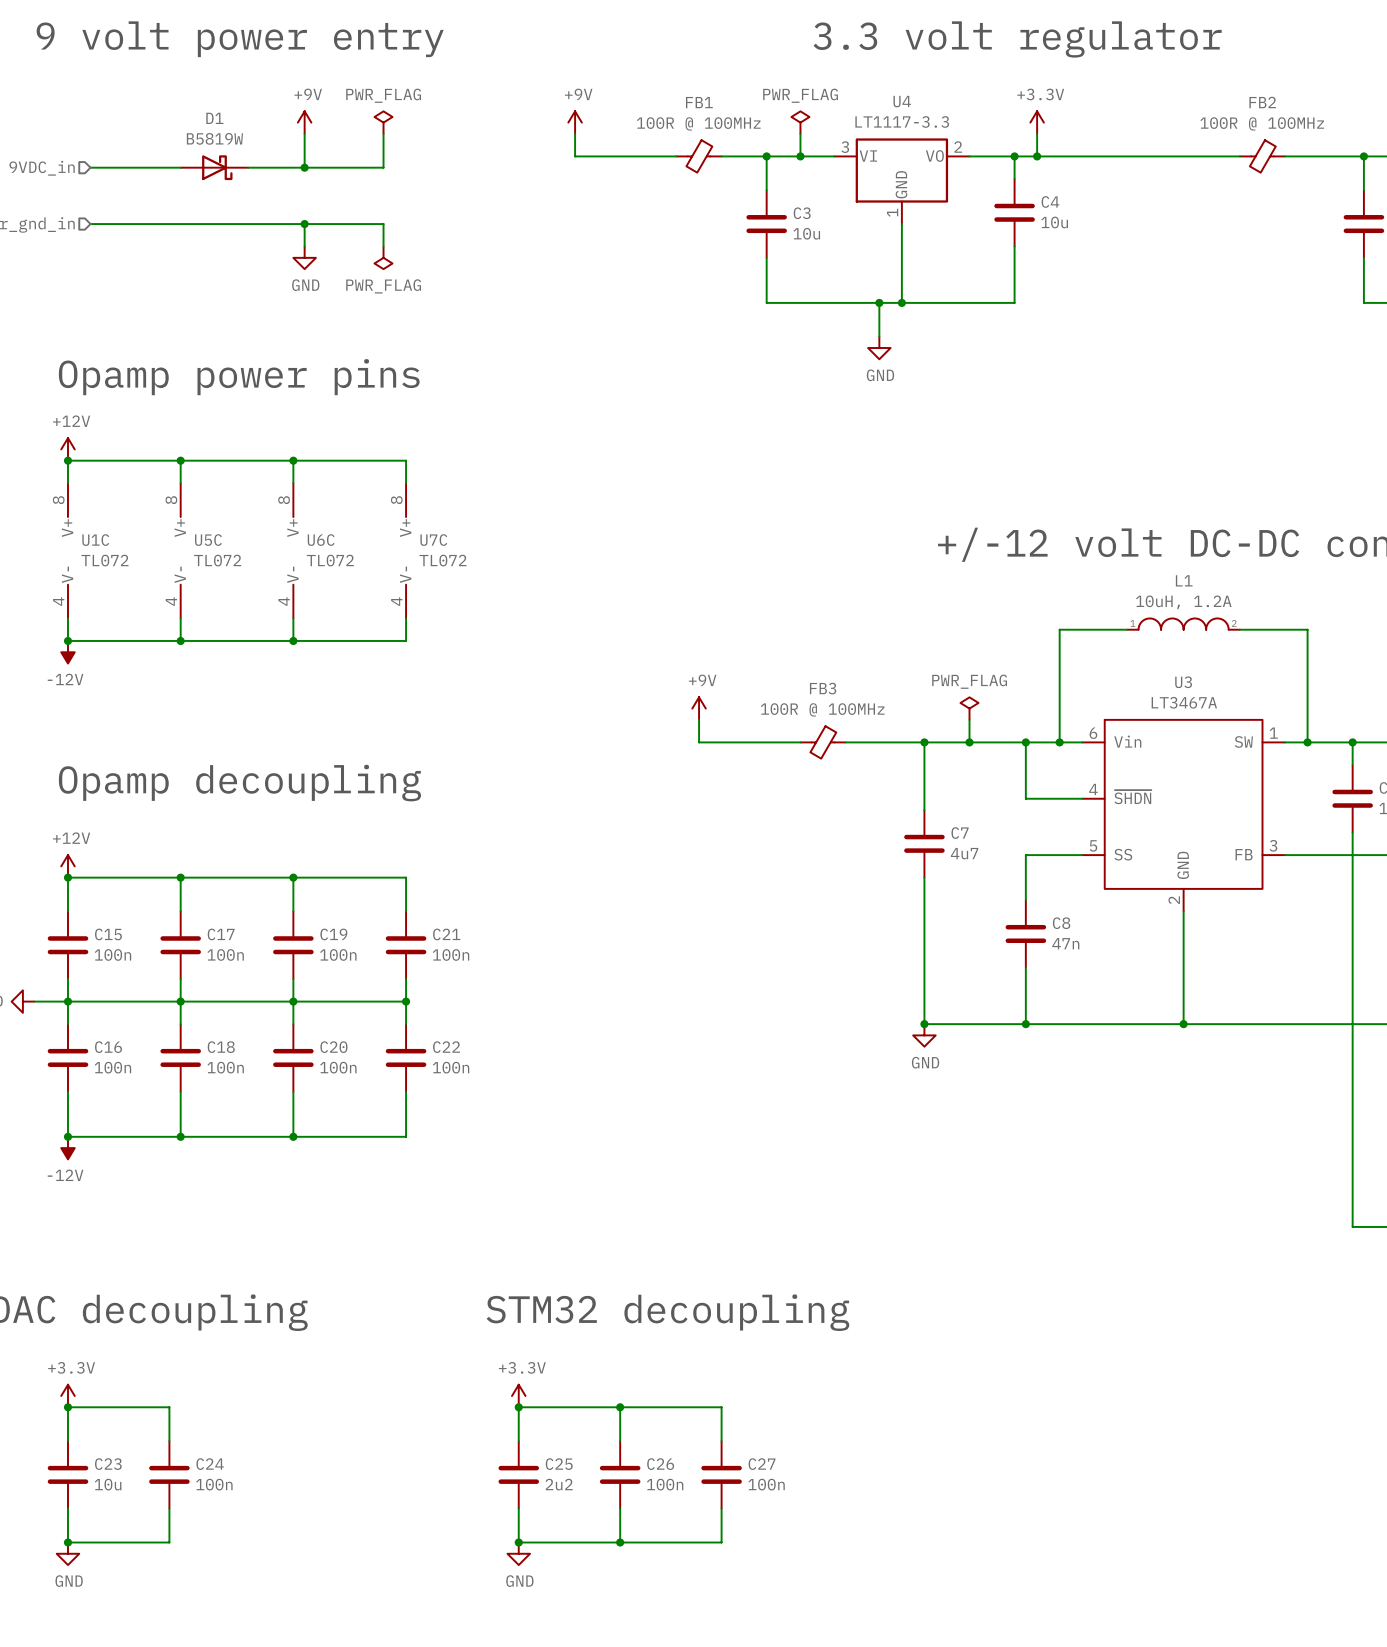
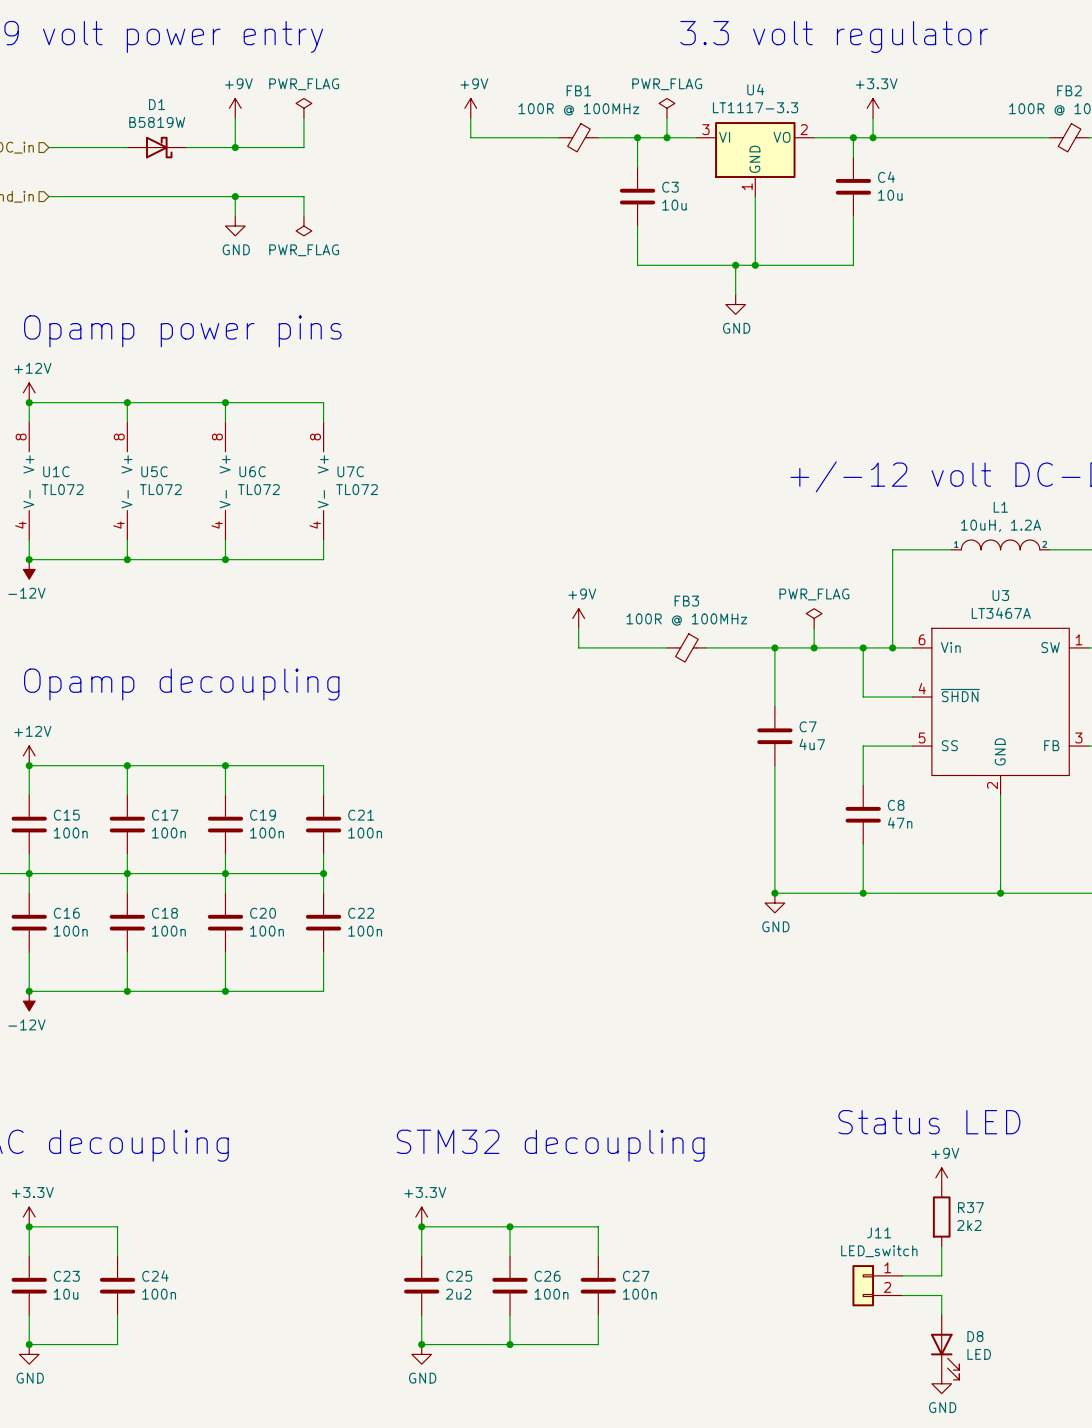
text: none -> Status LED (929, 1122)
power symbol: none -> +9V (941, 1177)
R37: none -> 2k2 (941, 1217)
wire: none -> (941, 1246) (941, 1275) (902, 1275)
J11: none -> LED_switch (877, 1285)
wire: none -> (902, 1295) (941, 1295) (941, 1315)
D8: none -> LED (945, 1347)
power symbol: none -> GND (941, 1383)

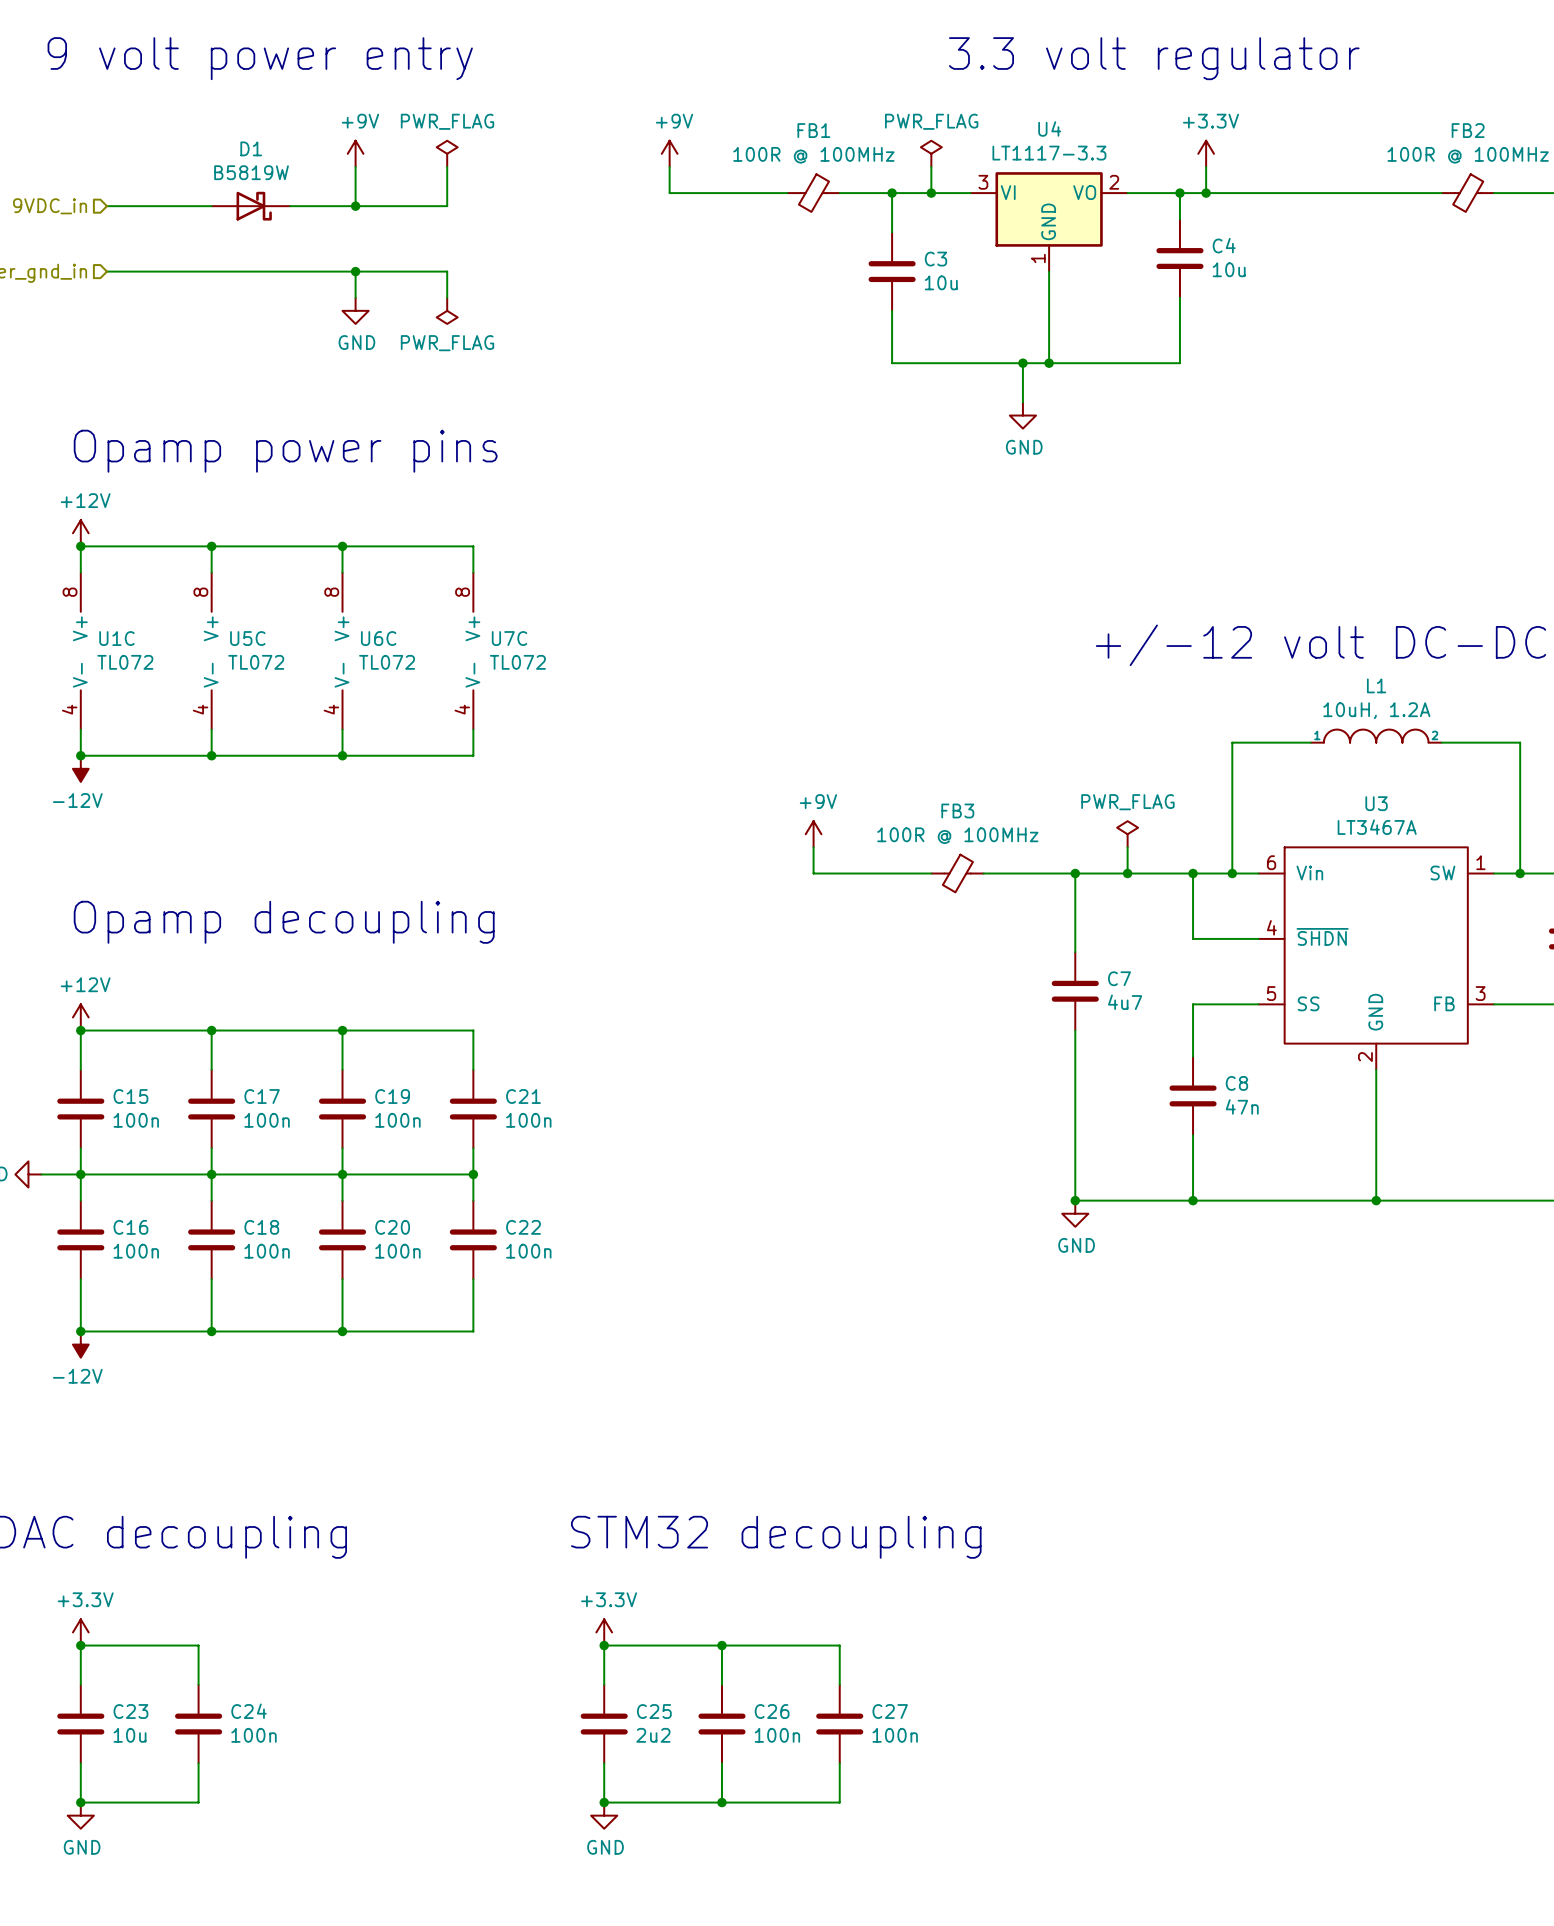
text: Status LED (929, 1122) -> none
power symbol: +9V (941, 1177) -> none
R37: 2k2 (941, 1217) -> none
wire: (941, 1246) (941, 1275) (902, 1275) -> none
J11: LED_switch (877, 1285) -> none
wire: (902, 1295) (941, 1295) (941, 1315) -> none
D8: LED (945, 1347) -> none
power symbol: GND (941, 1383) -> none

